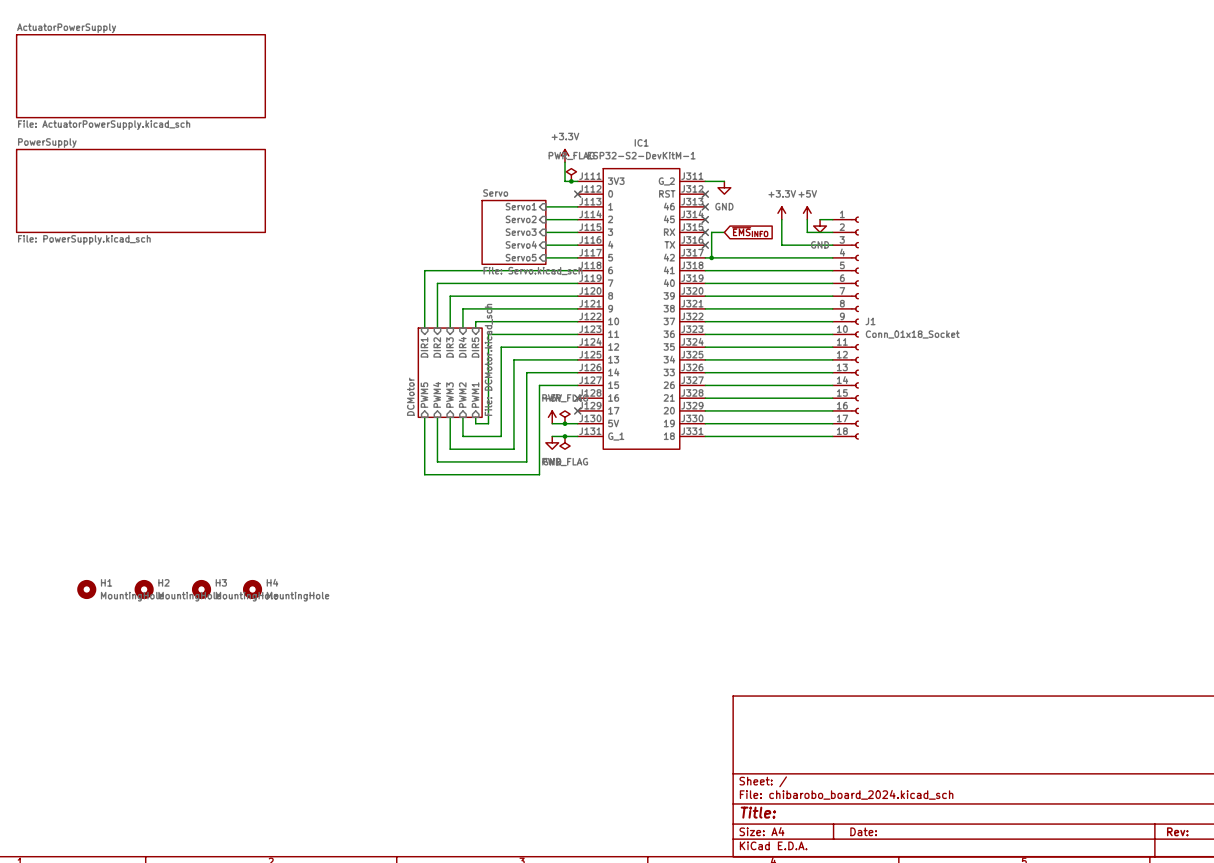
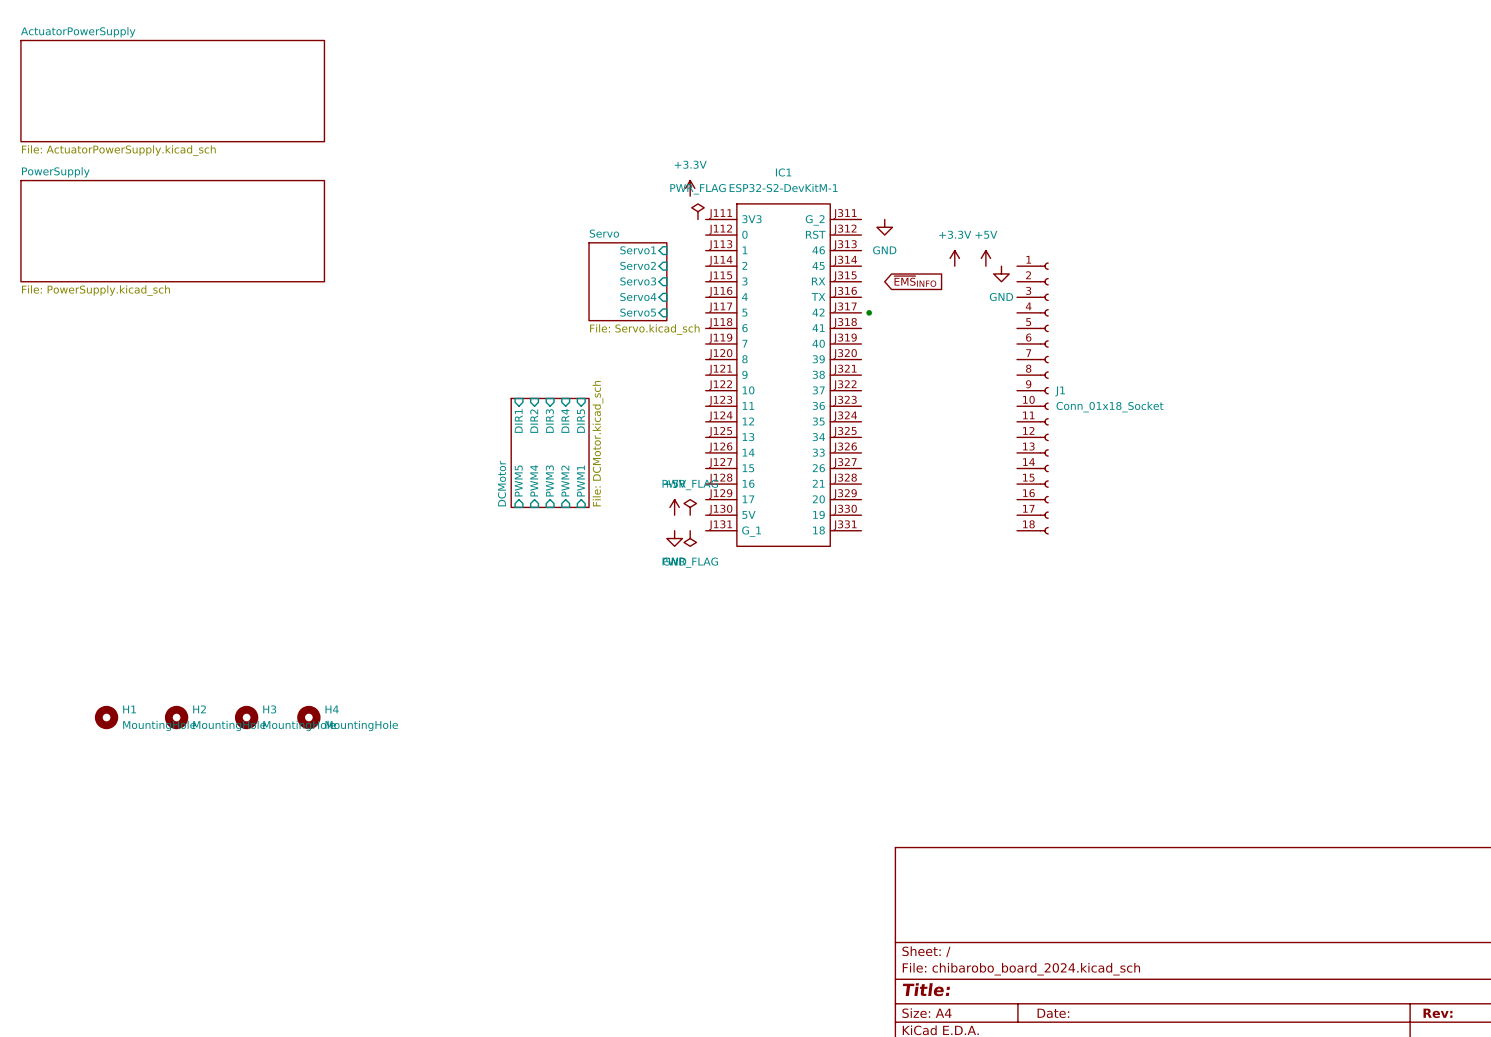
wire: (564, 162) (564, 181) (577, 181) -> none
junction: (571, 181) -> none
wire: (705, 181) (724, 181) -> none
no-connect mark: (577, 194) -> none
no-connect mark: (705, 194) -> none
wire: (545, 206) (577, 206) -> none
no-connect mark: (705, 206) -> none
wire: (545, 219) (577, 219) -> none
no-connect mark: (705, 219) -> none
wire: (781, 219) (781, 245) (832, 245) -> none
wire: (807, 219) (807, 232) (832, 232) -> none
wire: (820, 219) (832, 219) -> none
wire: (545, 232) (577, 232) -> none
no-connect mark: (705, 232) -> none
wire: (724, 232) (711, 232) (711, 257) -> none
wire: (545, 245) (577, 245) -> none
no-connect mark: (705, 245) -> none
wire: (545, 257) (577, 257) -> none
wire: (705, 257) (832, 257) -> none
wire: (577, 270) (424, 270) (424, 328) -> none
wire: (705, 270) (832, 270) -> none
wire: (577, 283) (437, 283) (437, 328) -> none
wire: (705, 283) (832, 283) -> none
wire: (577, 296) (450, 296) (450, 328) -> none
wire: (705, 296) (832, 296) -> none
wire: (577, 308) (462, 308) (462, 328) -> none
wire: (705, 308) (832, 308) -> none
wire: (577, 321) (475, 321) (475, 328) -> none
wire: (705, 321) (832, 321) -> none
wire: (577, 334) (488, 334) (488, 423) (475, 423) (475, 417) -> none
wire: (705, 334) (832, 334) -> none
wire: (577, 347) (501, 347) (501, 436) (462, 436) (462, 417) -> none
wire: (705, 347) (832, 347) -> none
wire: (577, 359) (513, 359) (513, 449) (450, 449) (450, 417) -> none
wire: (705, 359) (832, 359) -> none
wire: (577, 372) (526, 372) (526, 461) (437, 461) (437, 417) -> none
wire: (705, 372) (832, 372) -> none
wire: (577, 385) (539, 385) (539, 474) (424, 474) (424, 417) -> none
wire: (705, 385) (832, 385) -> none
no-connect mark: (577, 398) -> none
wire: (705, 398) (832, 398) -> none
no-connect mark: (577, 410) -> none
wire: (705, 410) (832, 410) -> none
wire: (552, 423) (577, 423) -> none
junction: (564, 423) -> none
wire: (705, 423) (832, 423) -> none
wire: (552, 436) (577, 436) -> none
junction: (564, 436) -> none
wire: (705, 436) (832, 436) -> none

